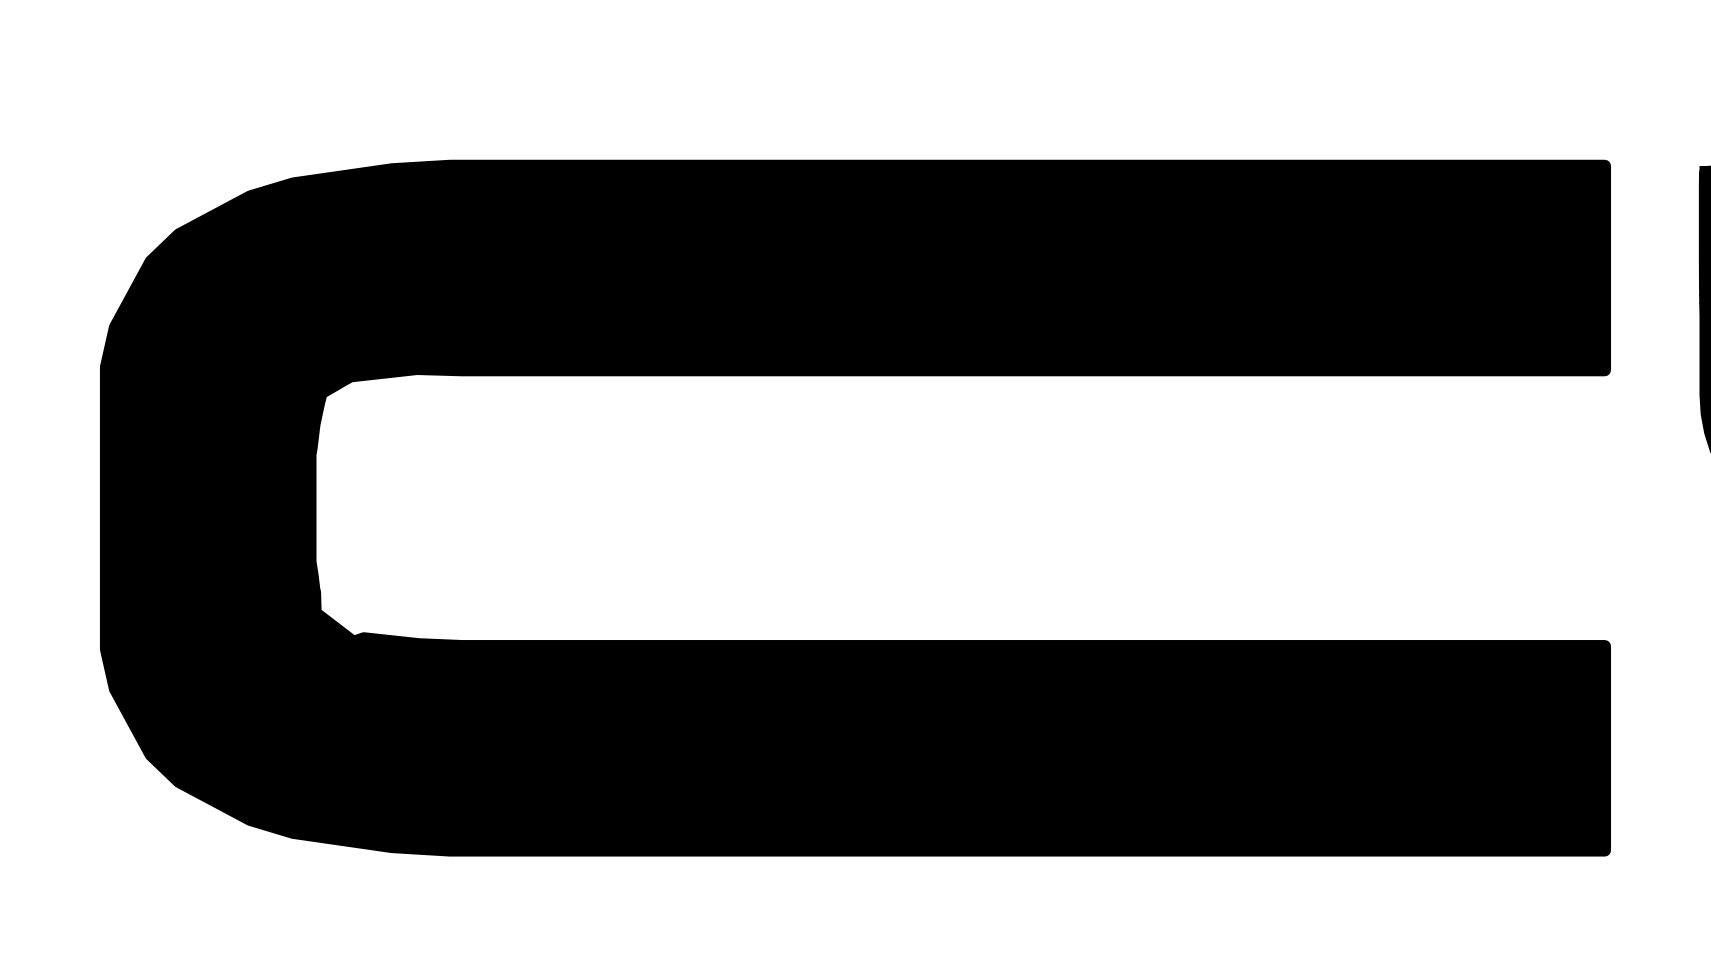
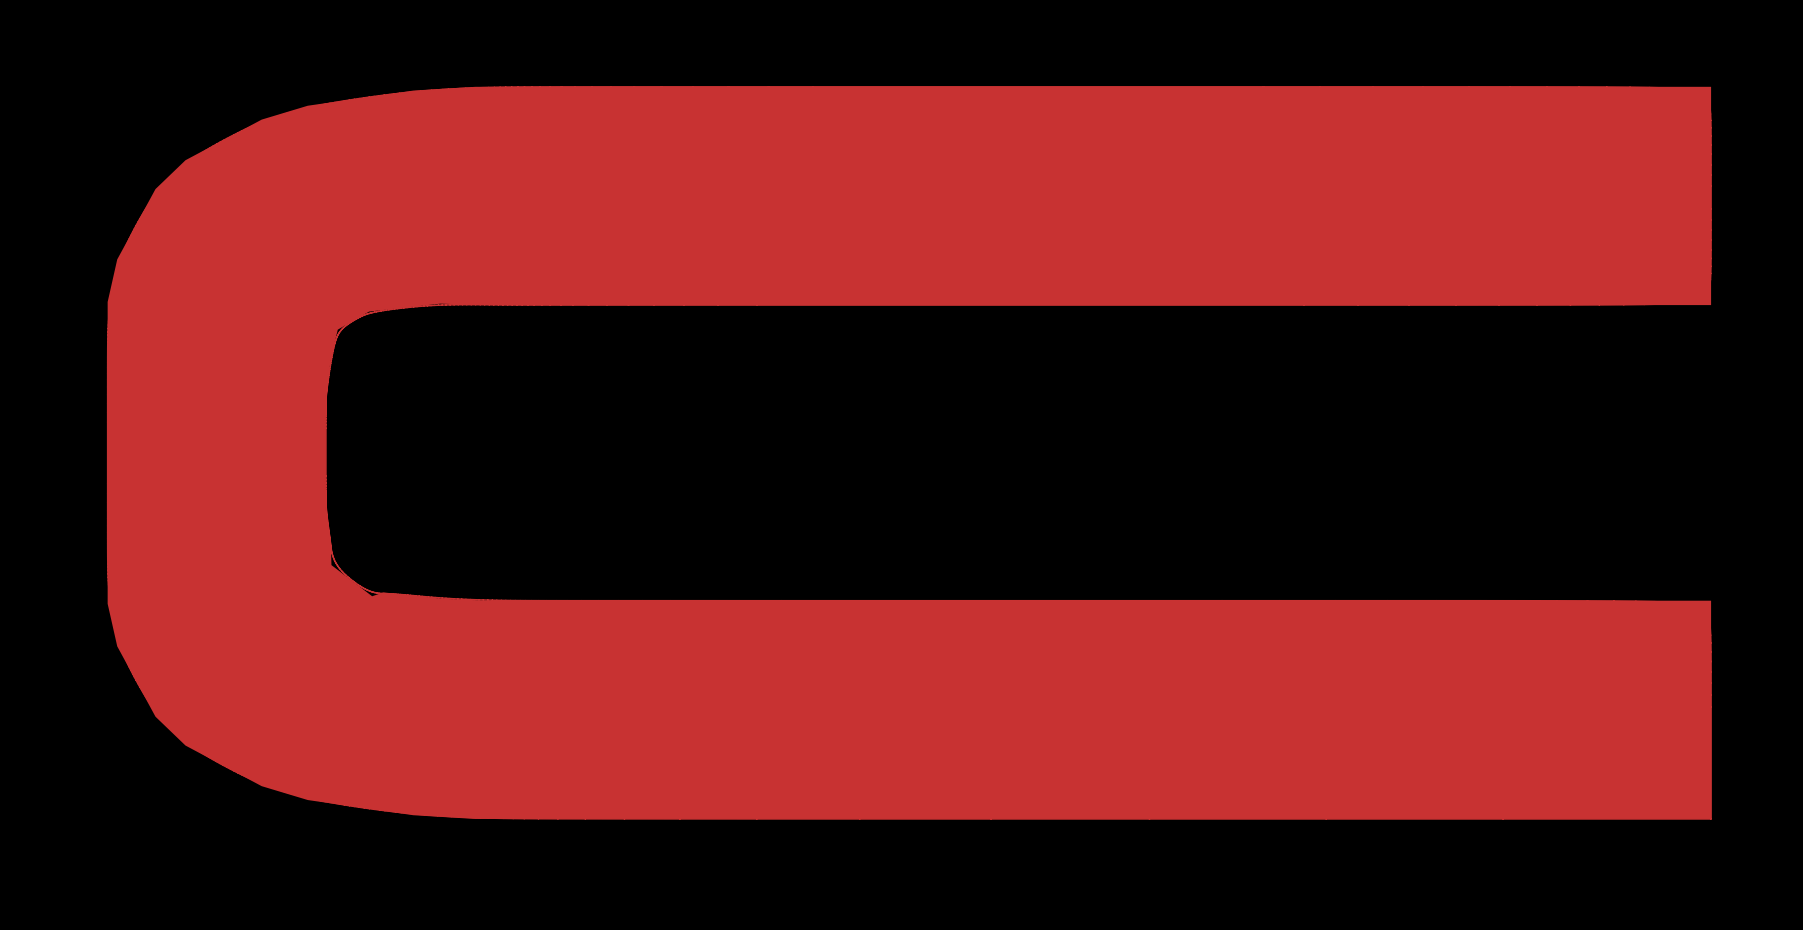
drawing shape: [99, 159, 1612, 857] -> [107, 86, 1712, 819]

